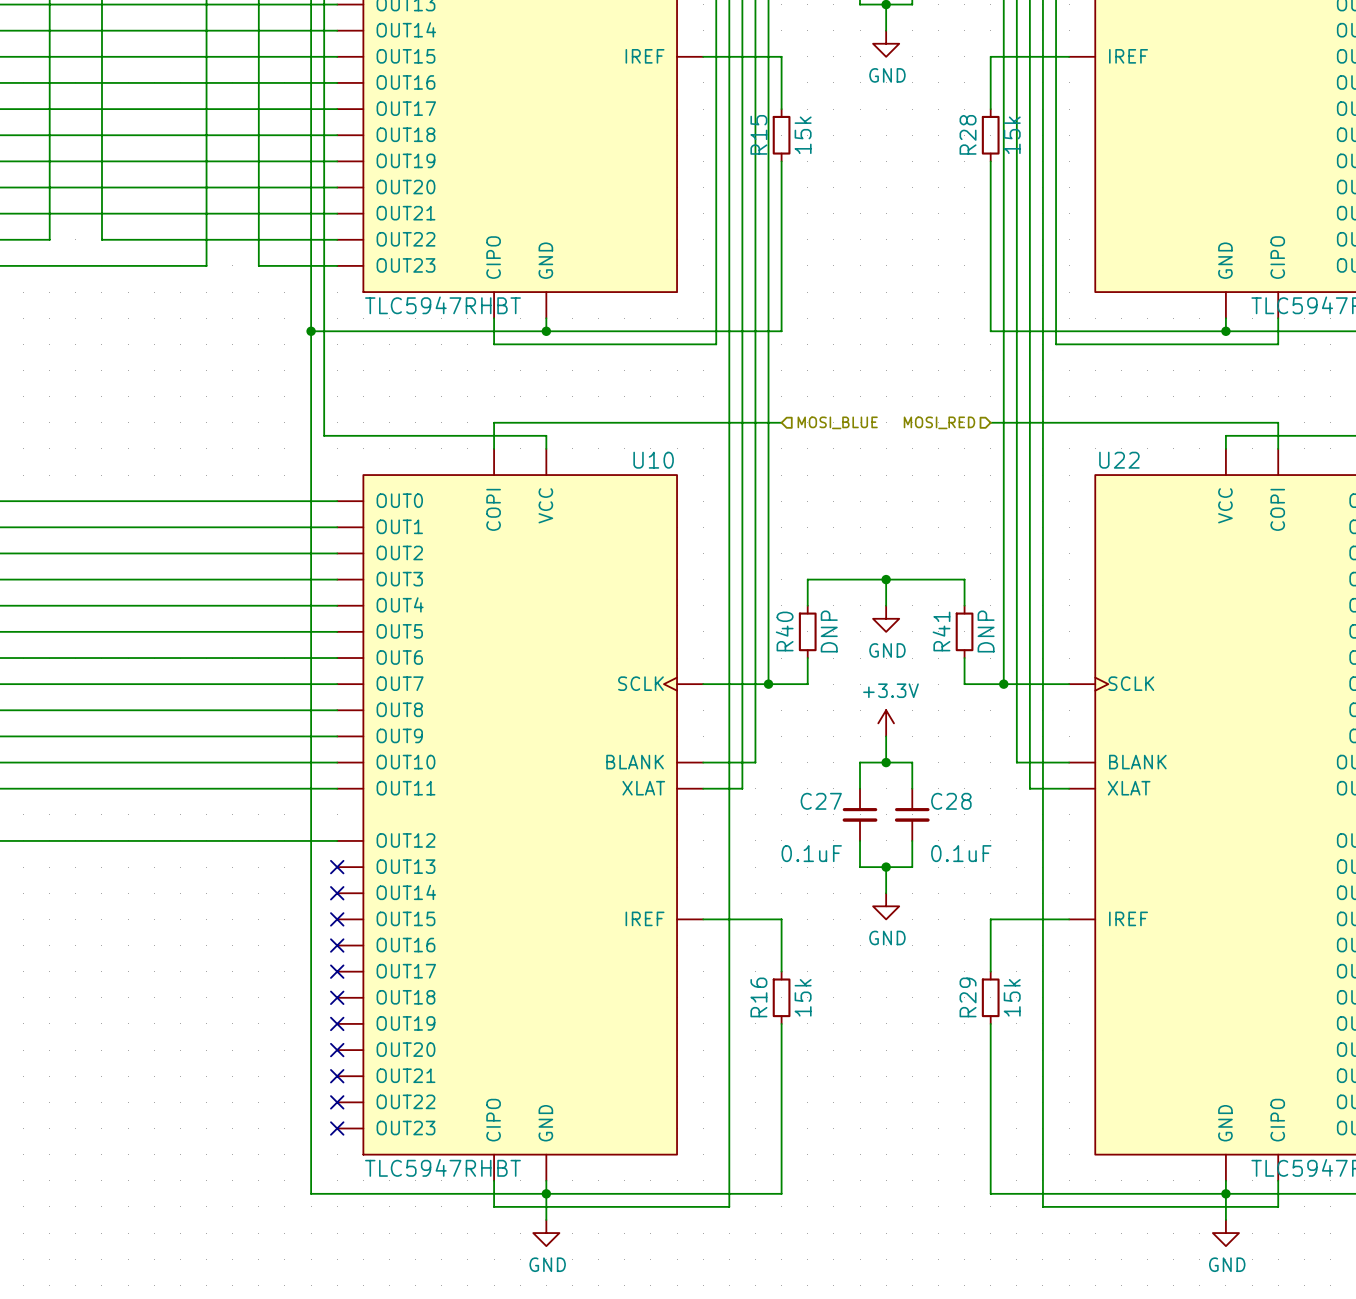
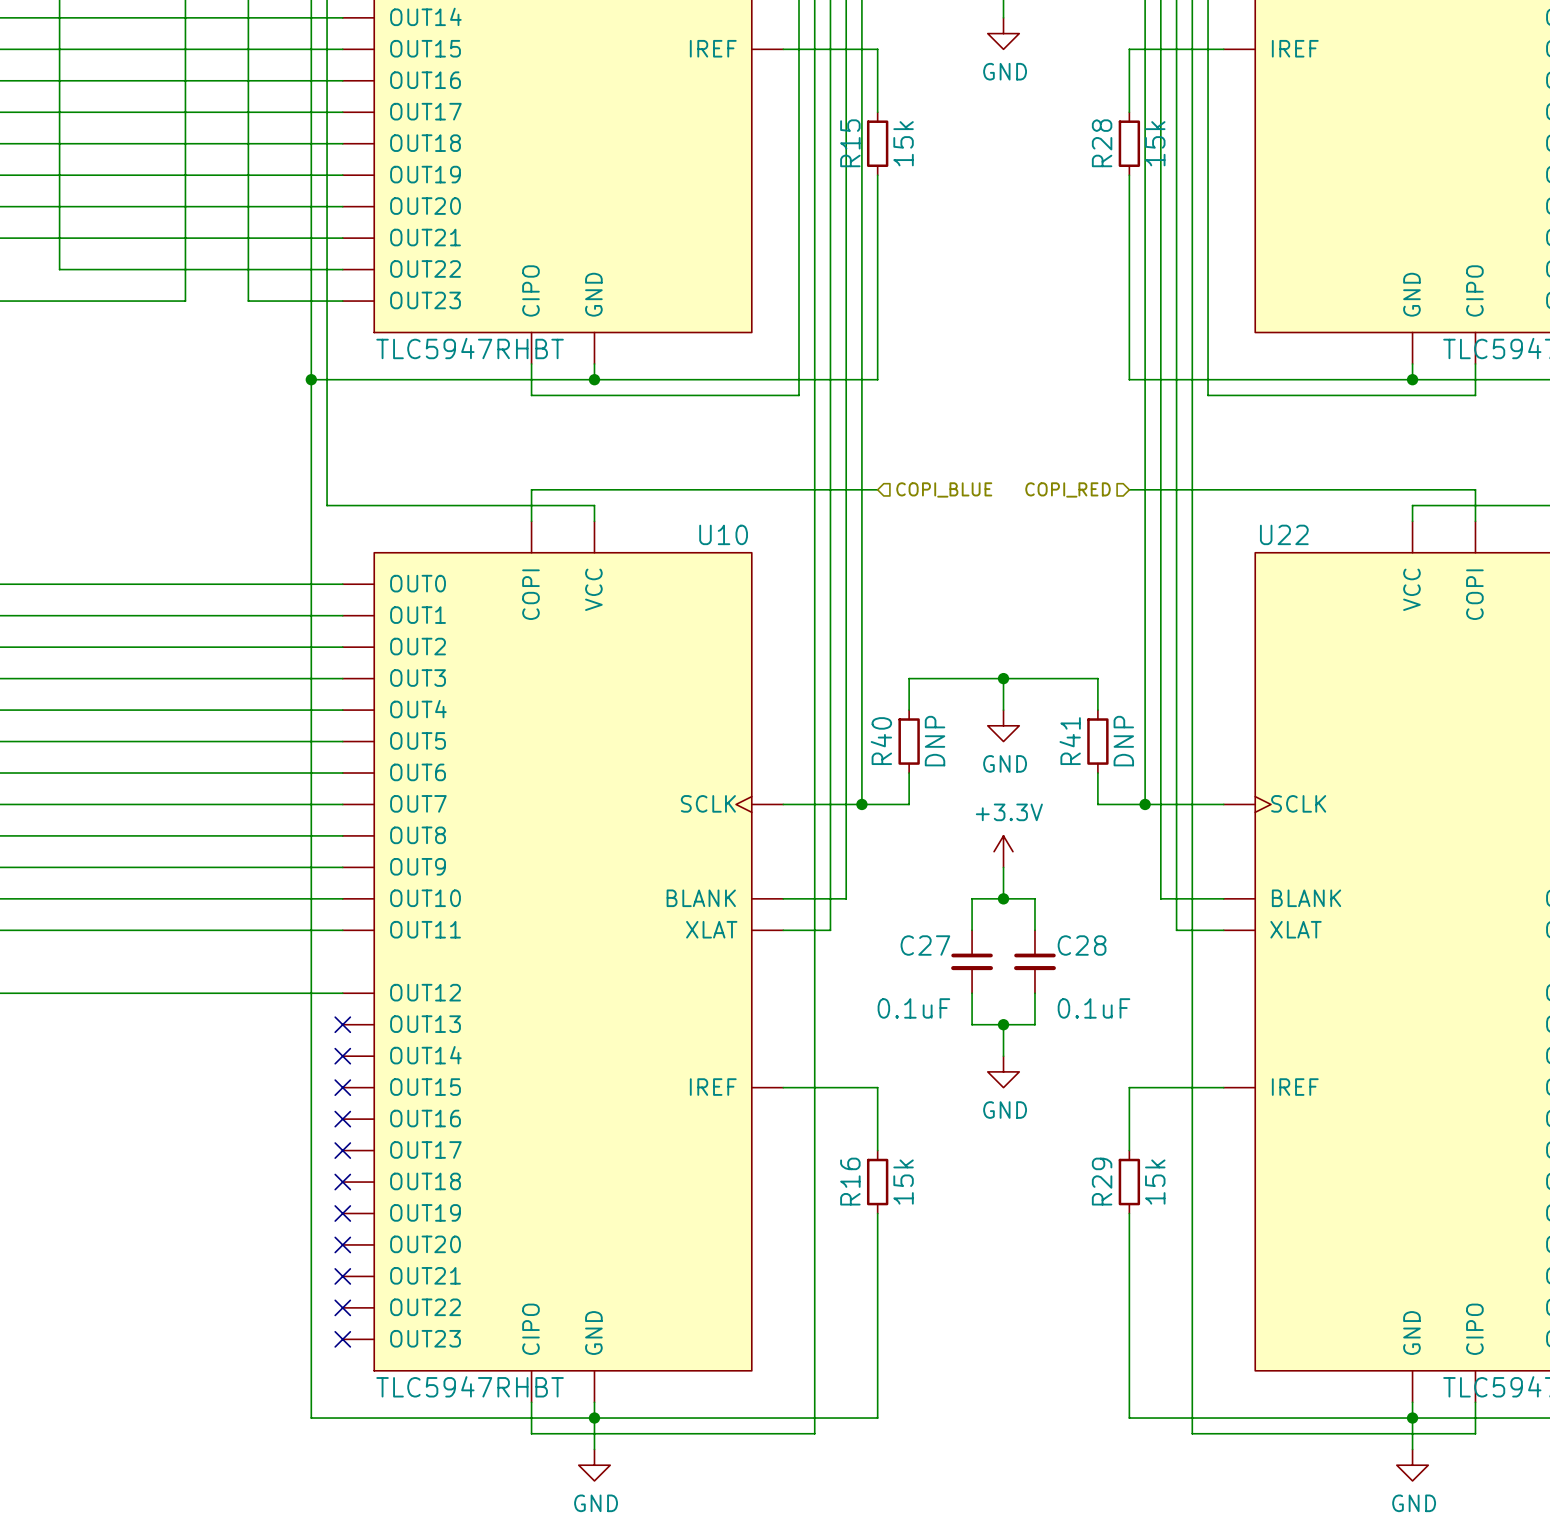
hierarchical label: MOSI_BLUE (837, 422) -> COPI_BLUE (944, 489)
hierarchical label: MOSI_RED (939, 422) -> COPI_RED (1068, 489)

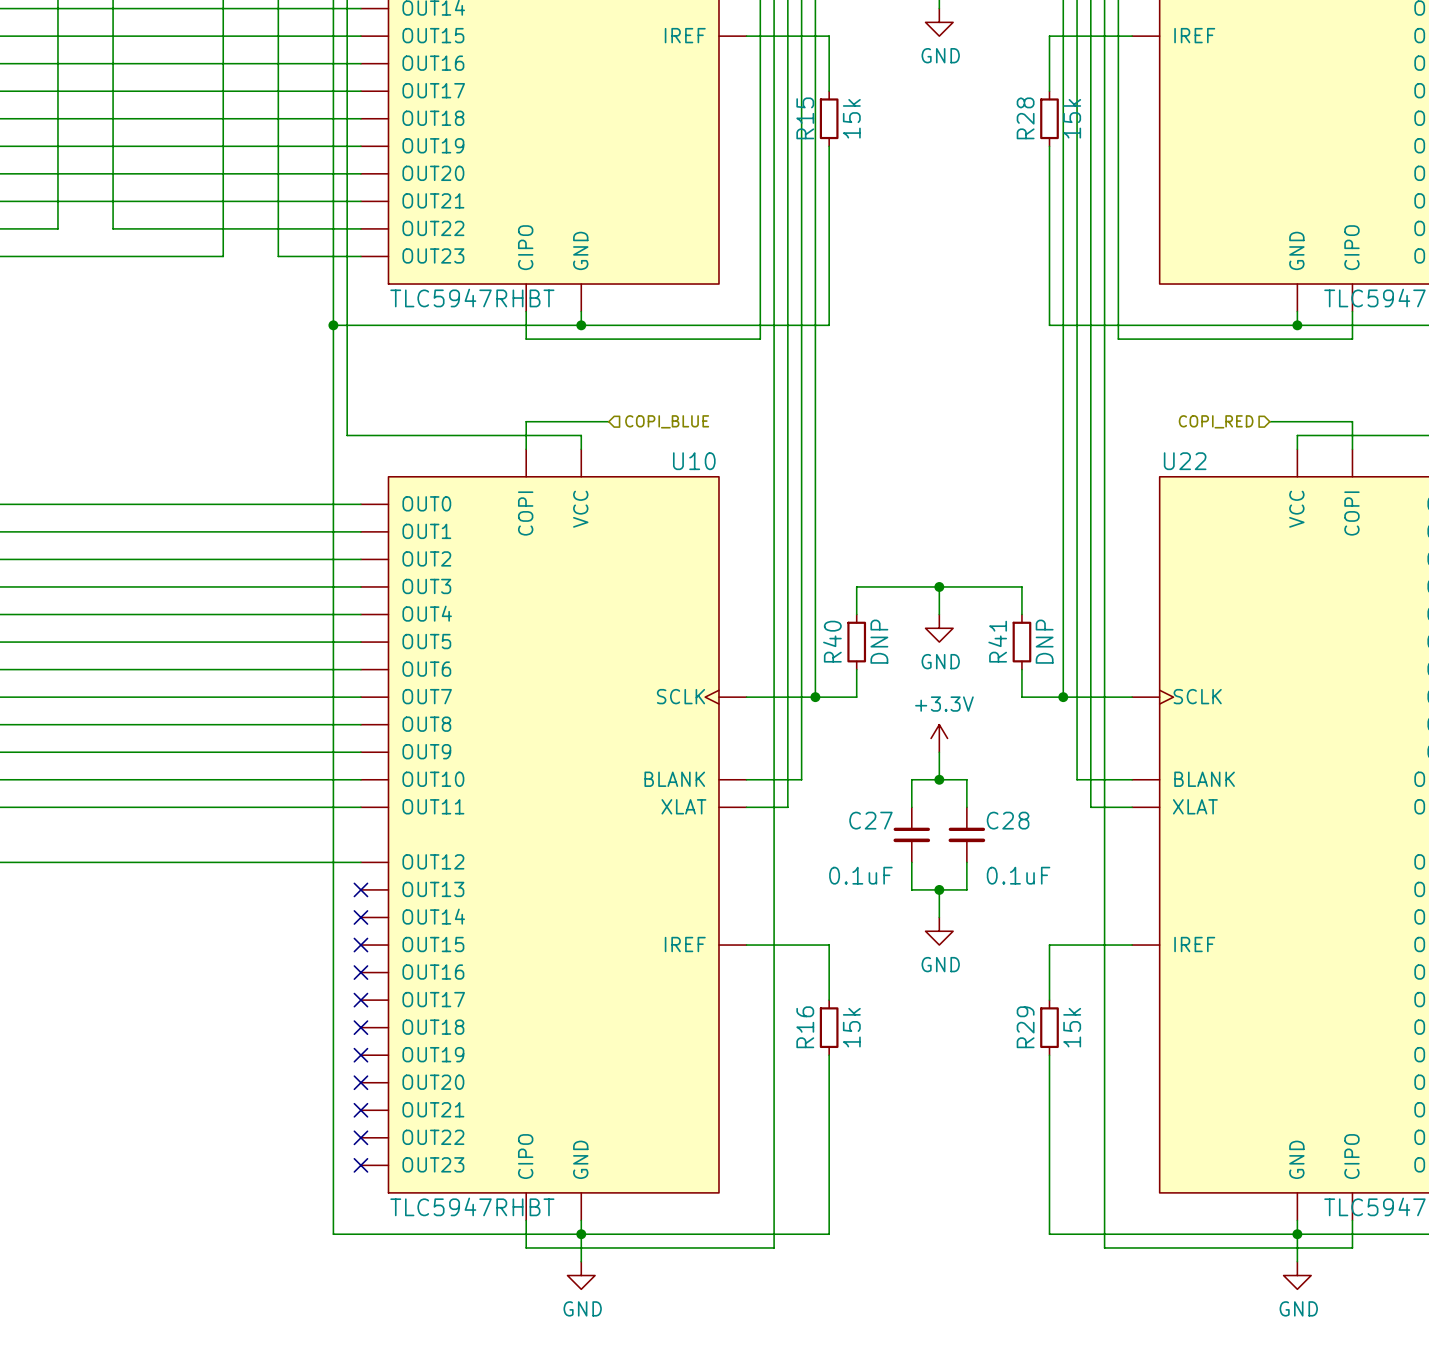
wire: (625, 489) (877, 489) -> none
hierarchical label position: COPI_BLUE (944, 489) -> COPI_BLUE (667, 421)
hierarchical label position: COPI_RED (1068, 489) -> COPI_RED (1216, 421)
wire: (1129, 489) (1381, 489) -> none

